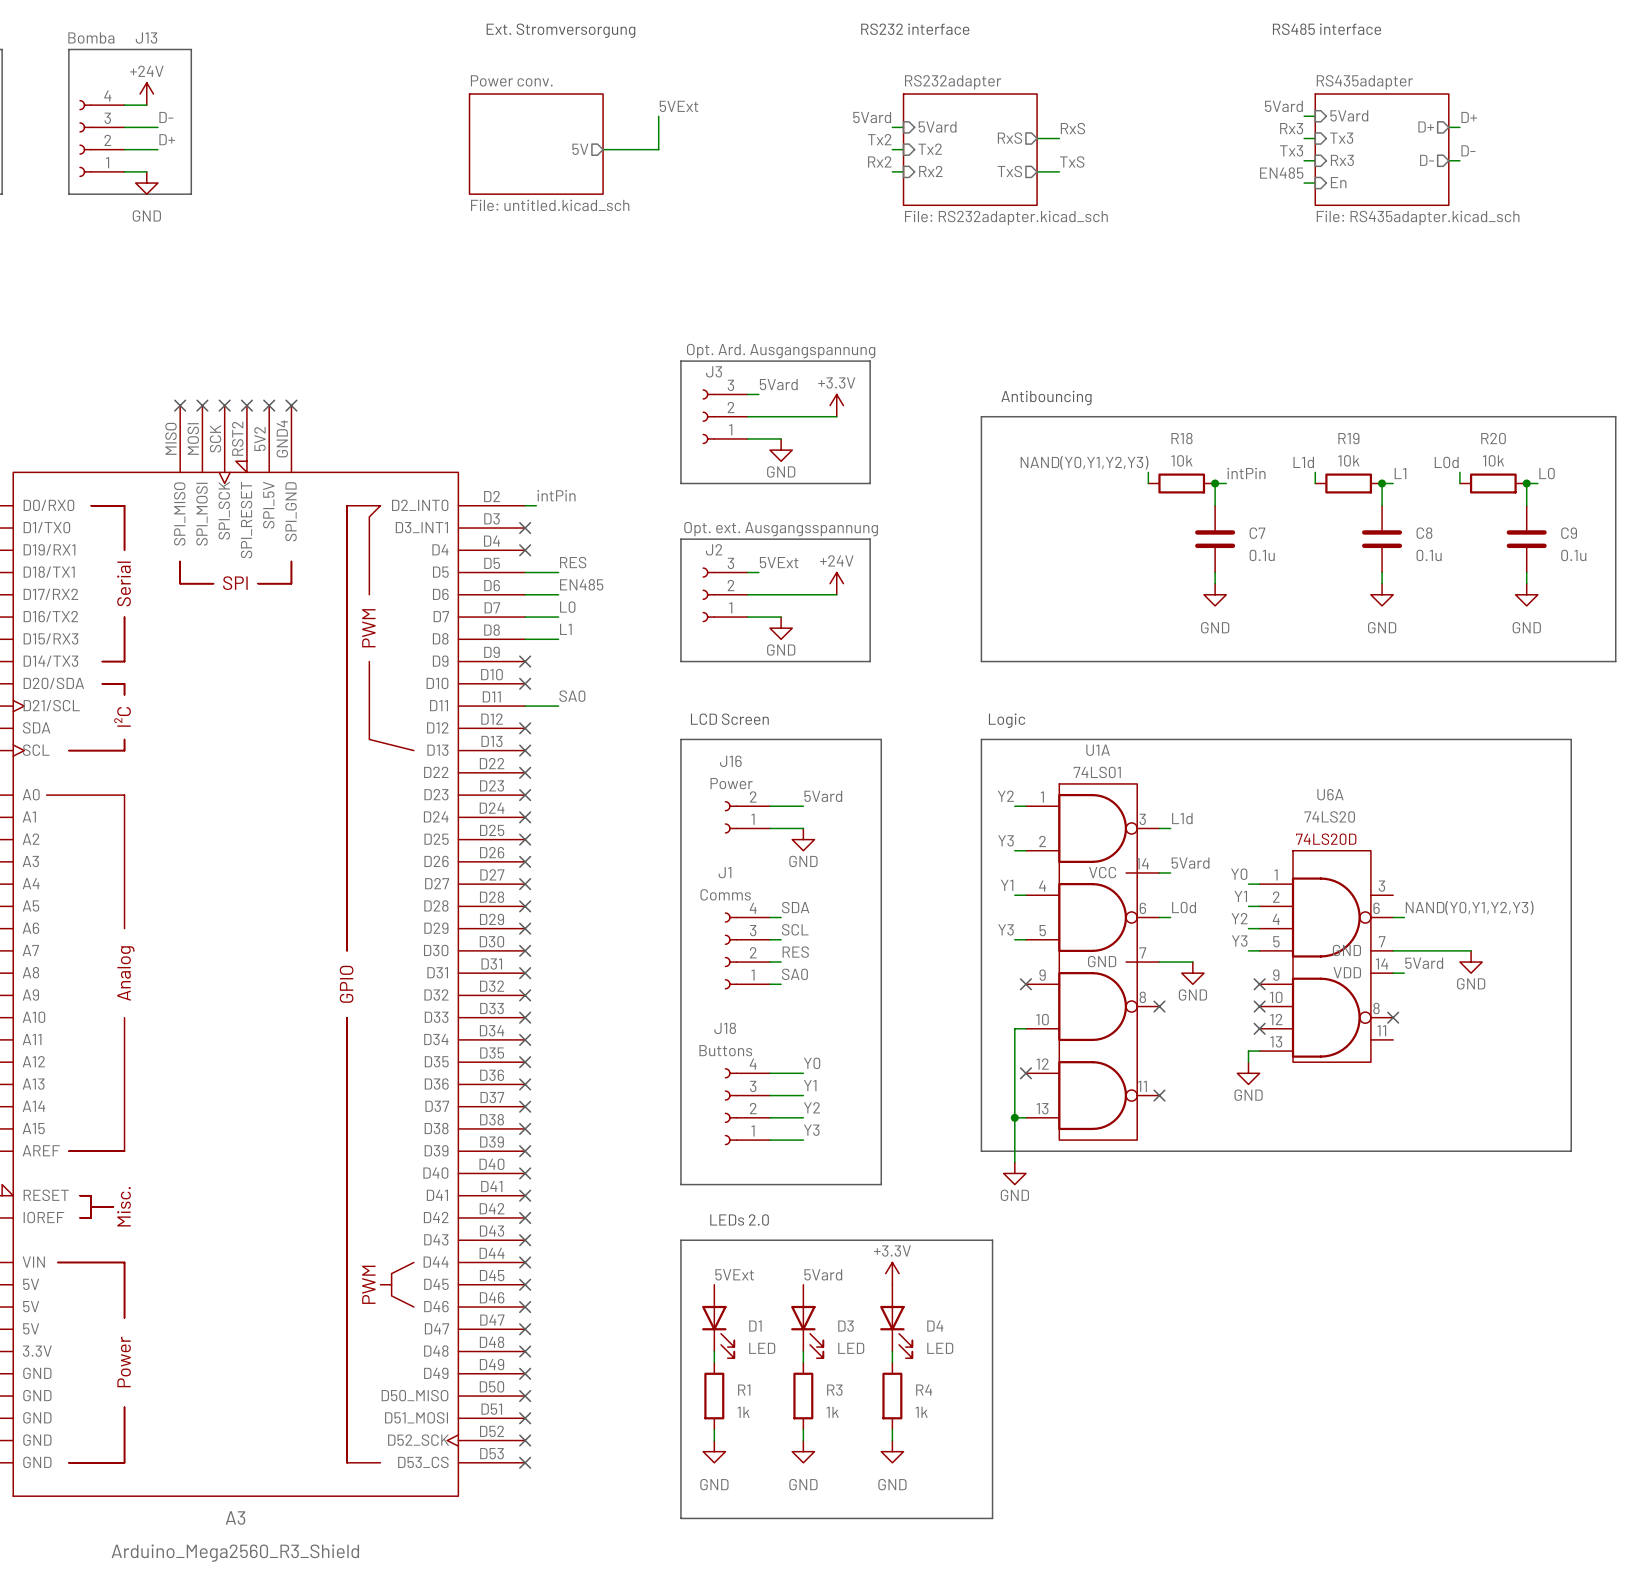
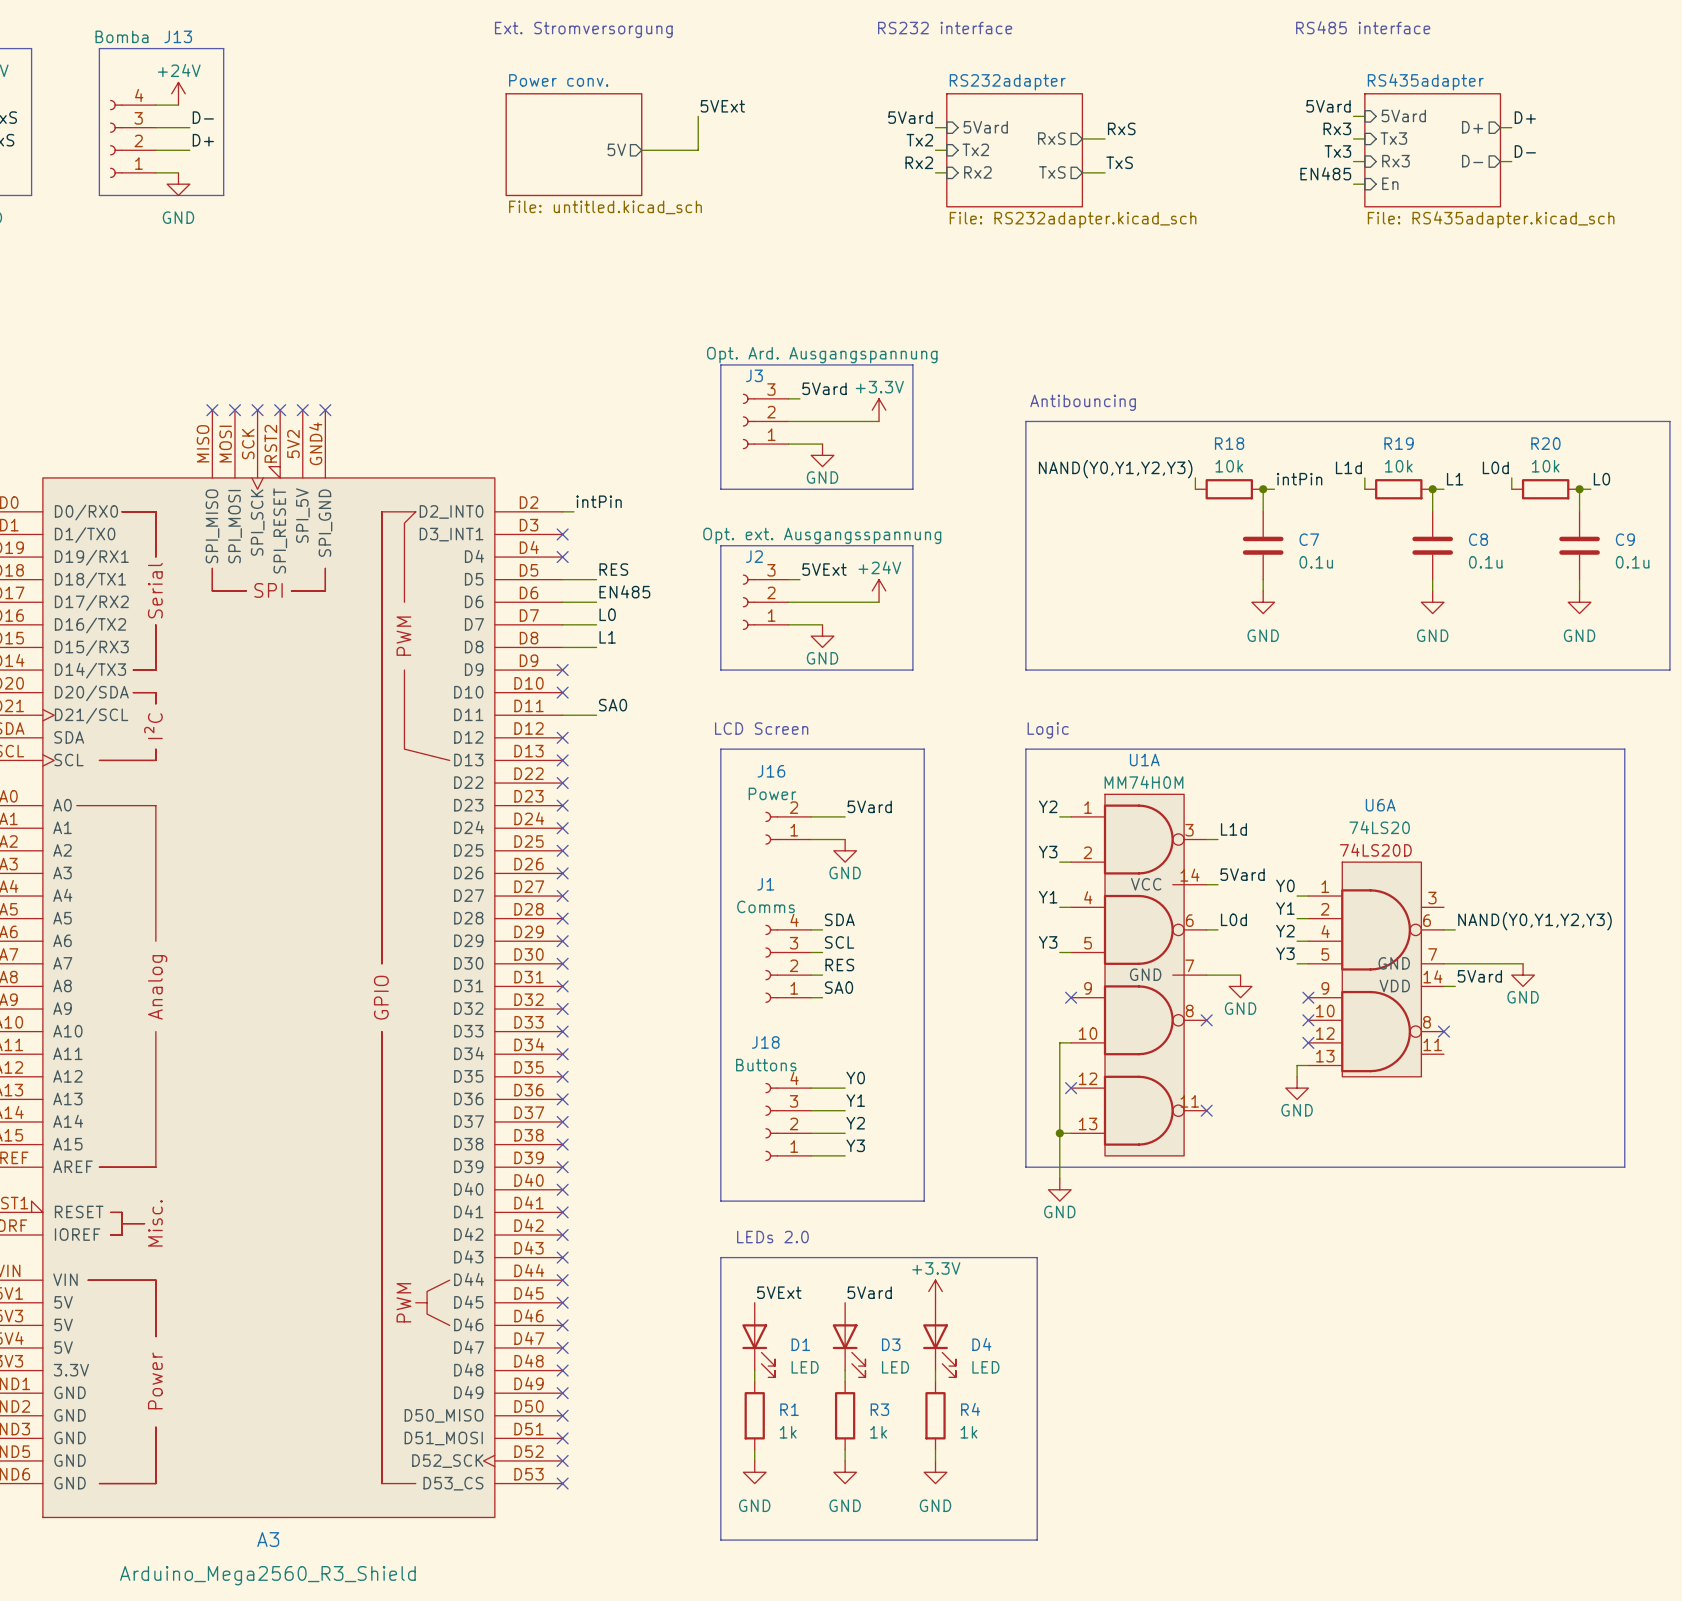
U1A value: 74LS01 (1097, 772) -> MM74H0M (1143, 782)

